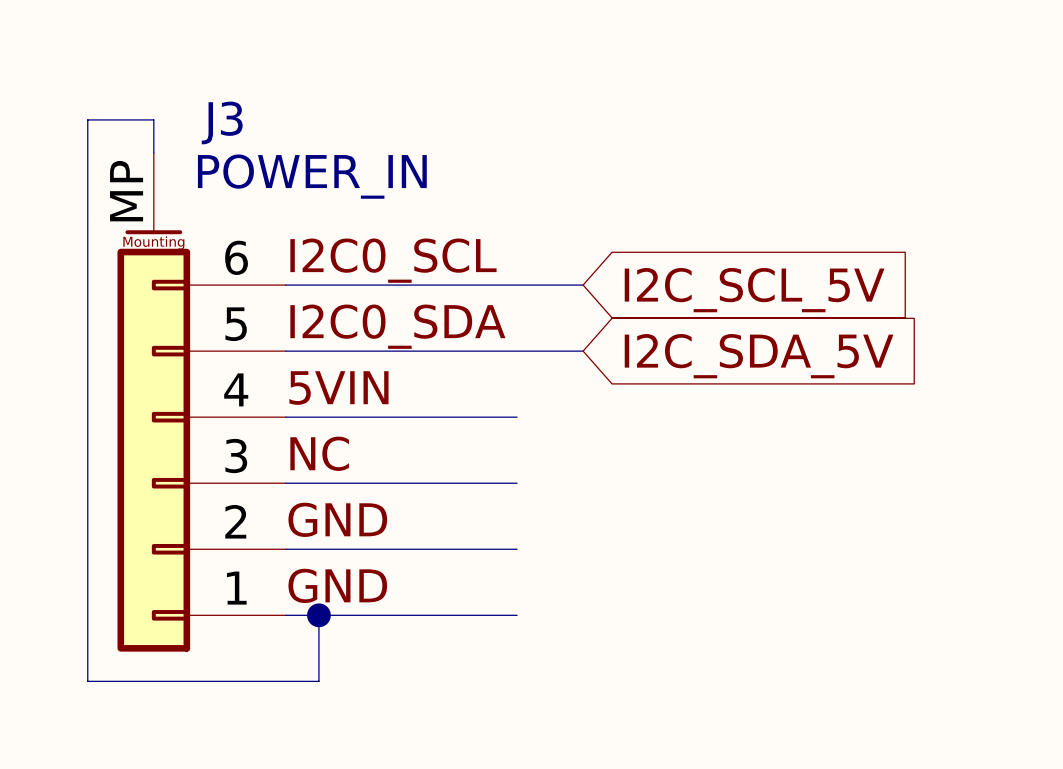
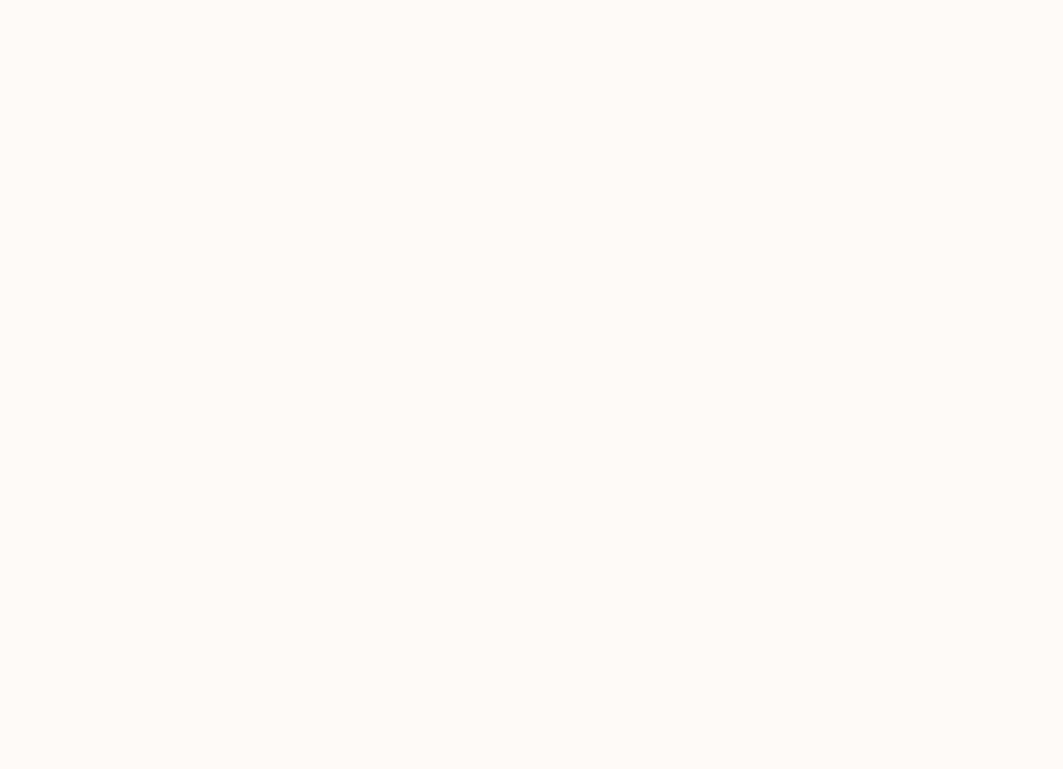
wire: (153, 152) (153, 119) (87, 119) (87, 681) (318, 681) (318, 615) -> none
label: I2C0_SCL (393, 260) -> none
wire: (285, 285) (583, 285) -> none
global label: I2C_SCL_5V (754, 290) -> none
label: I2C0_SDA (397, 326) -> none
wire: (285, 351) (583, 351) -> none
global label: I2C_SDA_5V (759, 356) -> none
label: 5VIN (338, 388) -> none
J3: POWER_IN (201, 402) -> none
wire: (285, 417) (517, 417) -> none
label: NC (319, 453) -> none
wire: (285, 483) (517, 483) -> none
label: GND (337, 519) -> none
wire: (285, 549) (517, 549) -> none
label: GND (337, 585) -> none
wire: (285, 615) (517, 615) -> none
junction: (318, 615) -> none

